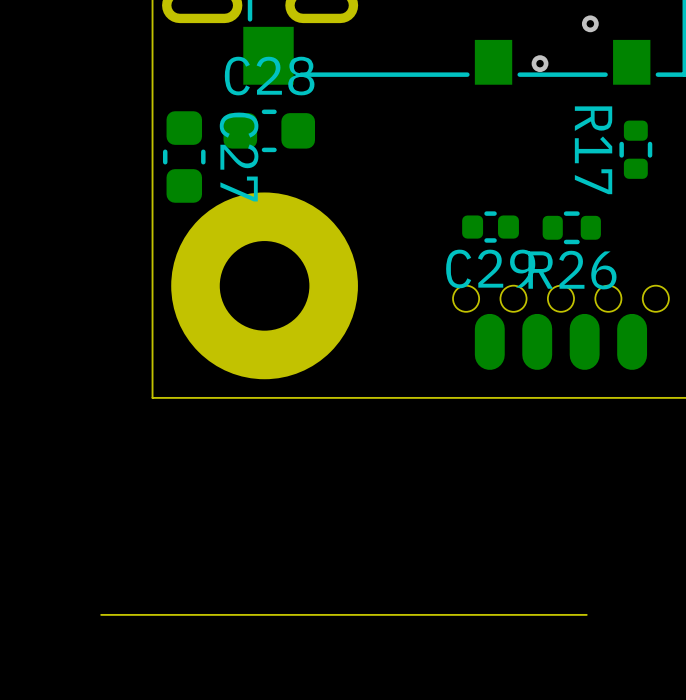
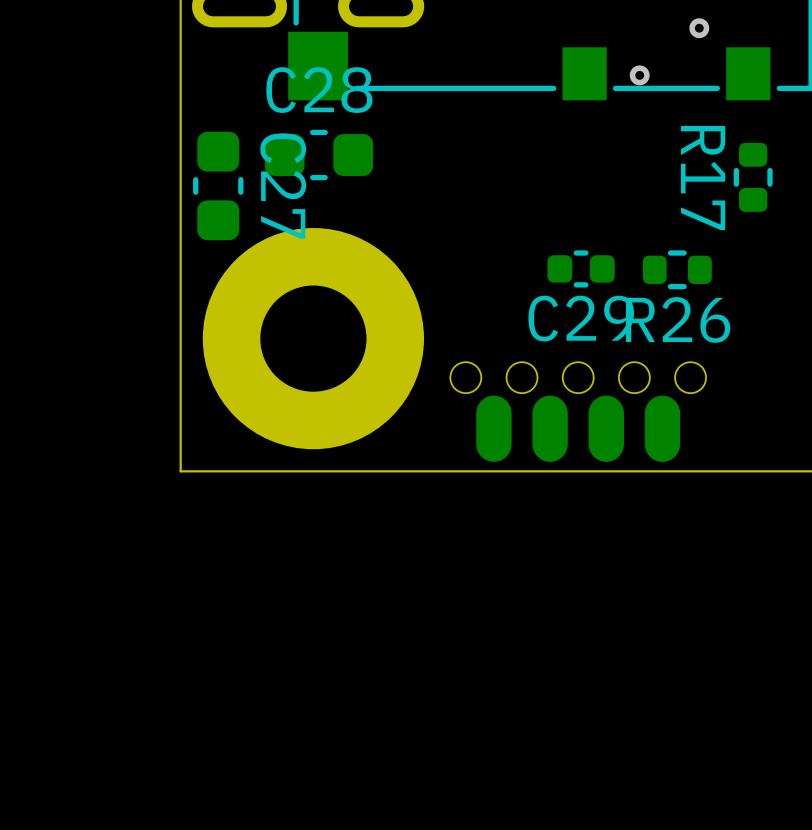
part position: (560, 327) -> (578, 412)
board edge: (586, 614) (101, 614) -> none

